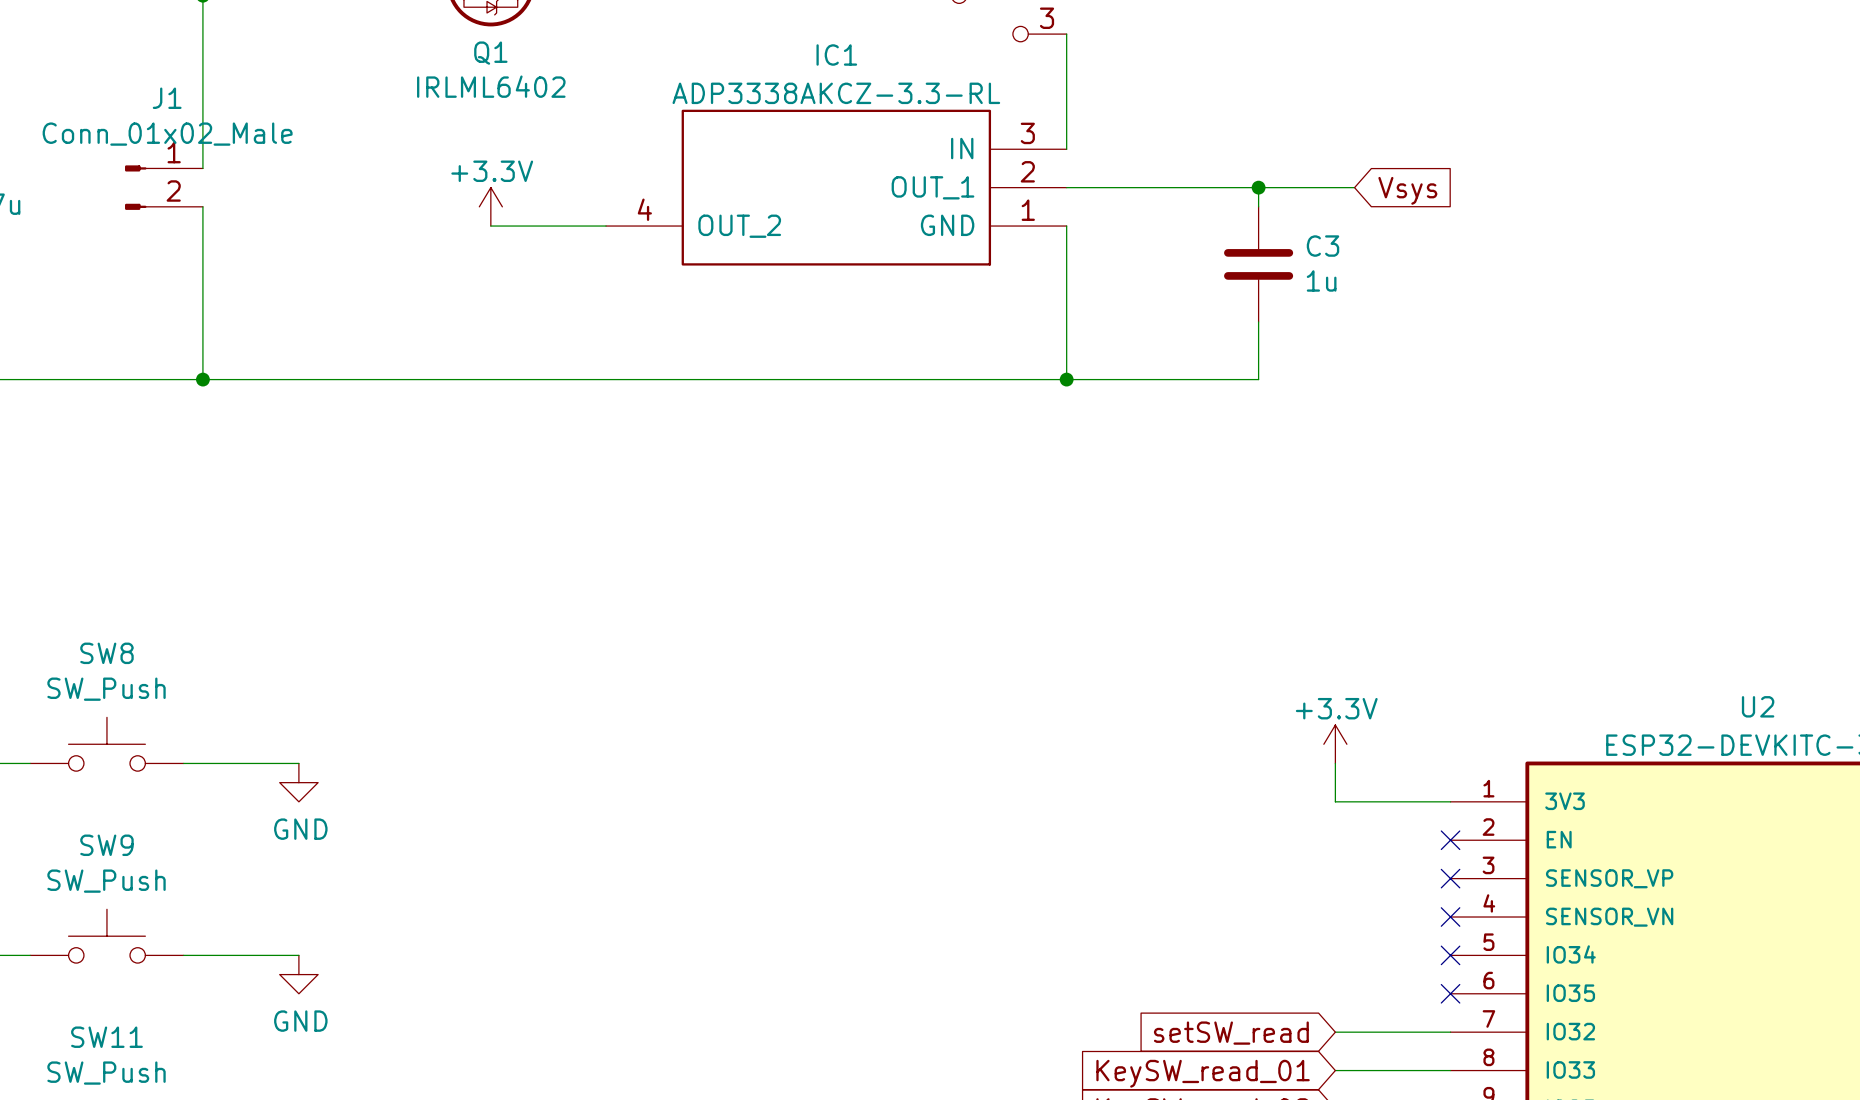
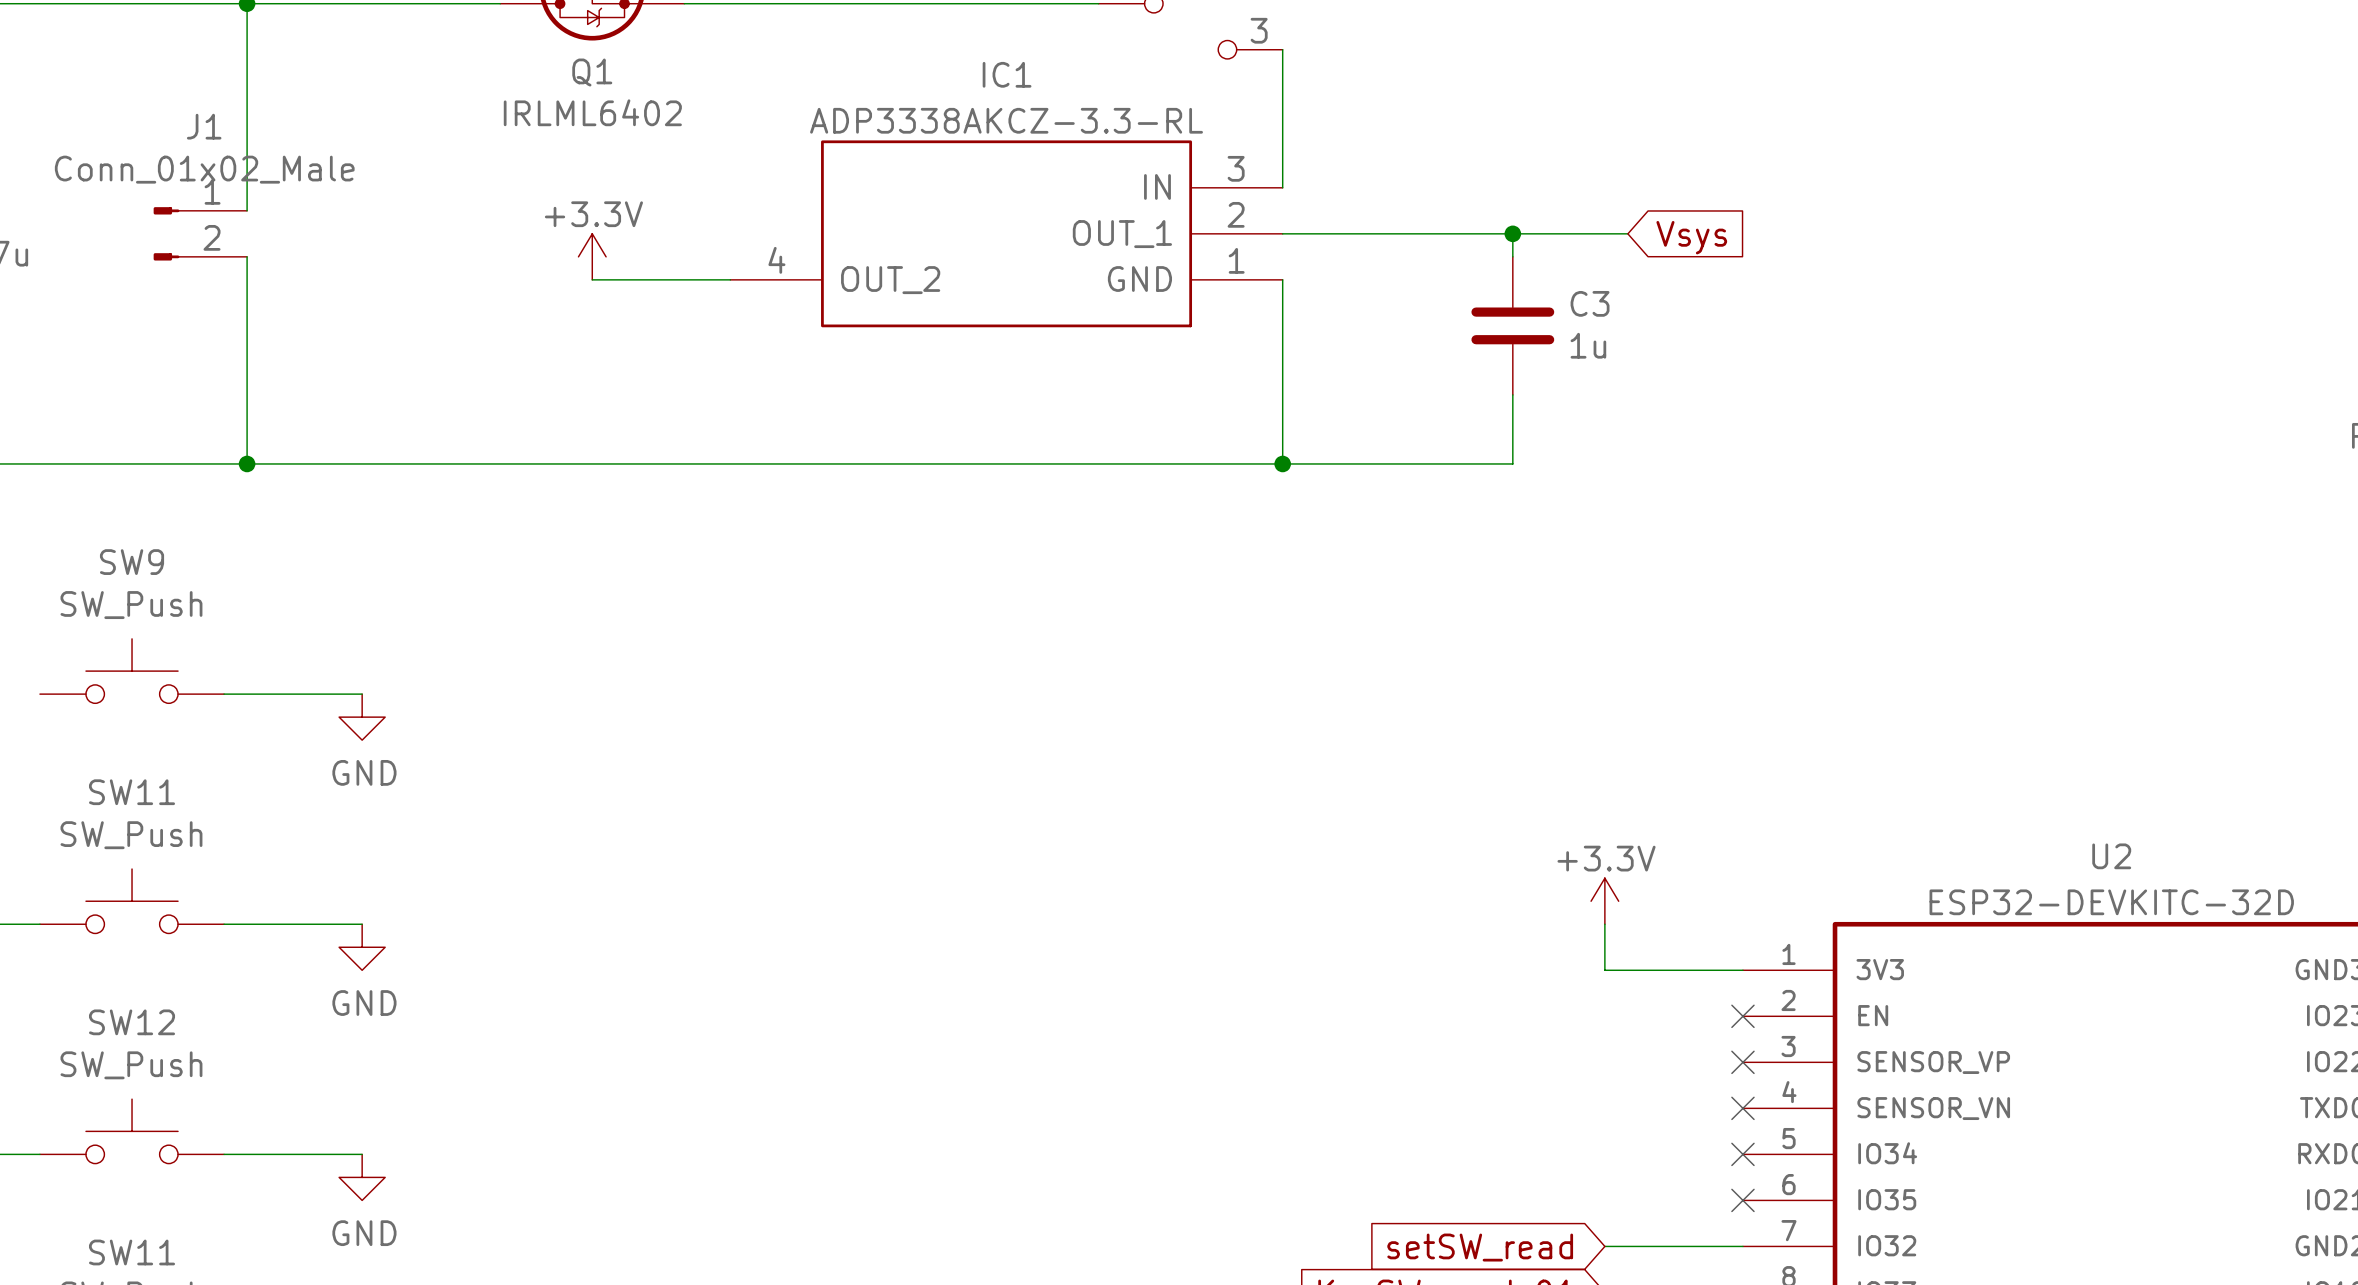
SW9: none -> SW_Push (132, 671)
wire: none -> (224, 694) (362, 694)
power symbol: none -> GND (362, 717)
SW8 name: SW8 (106, 653) -> SW11 (132, 792)
SW9 name: SW9 (106, 845) -> SW12 (132, 1022)

